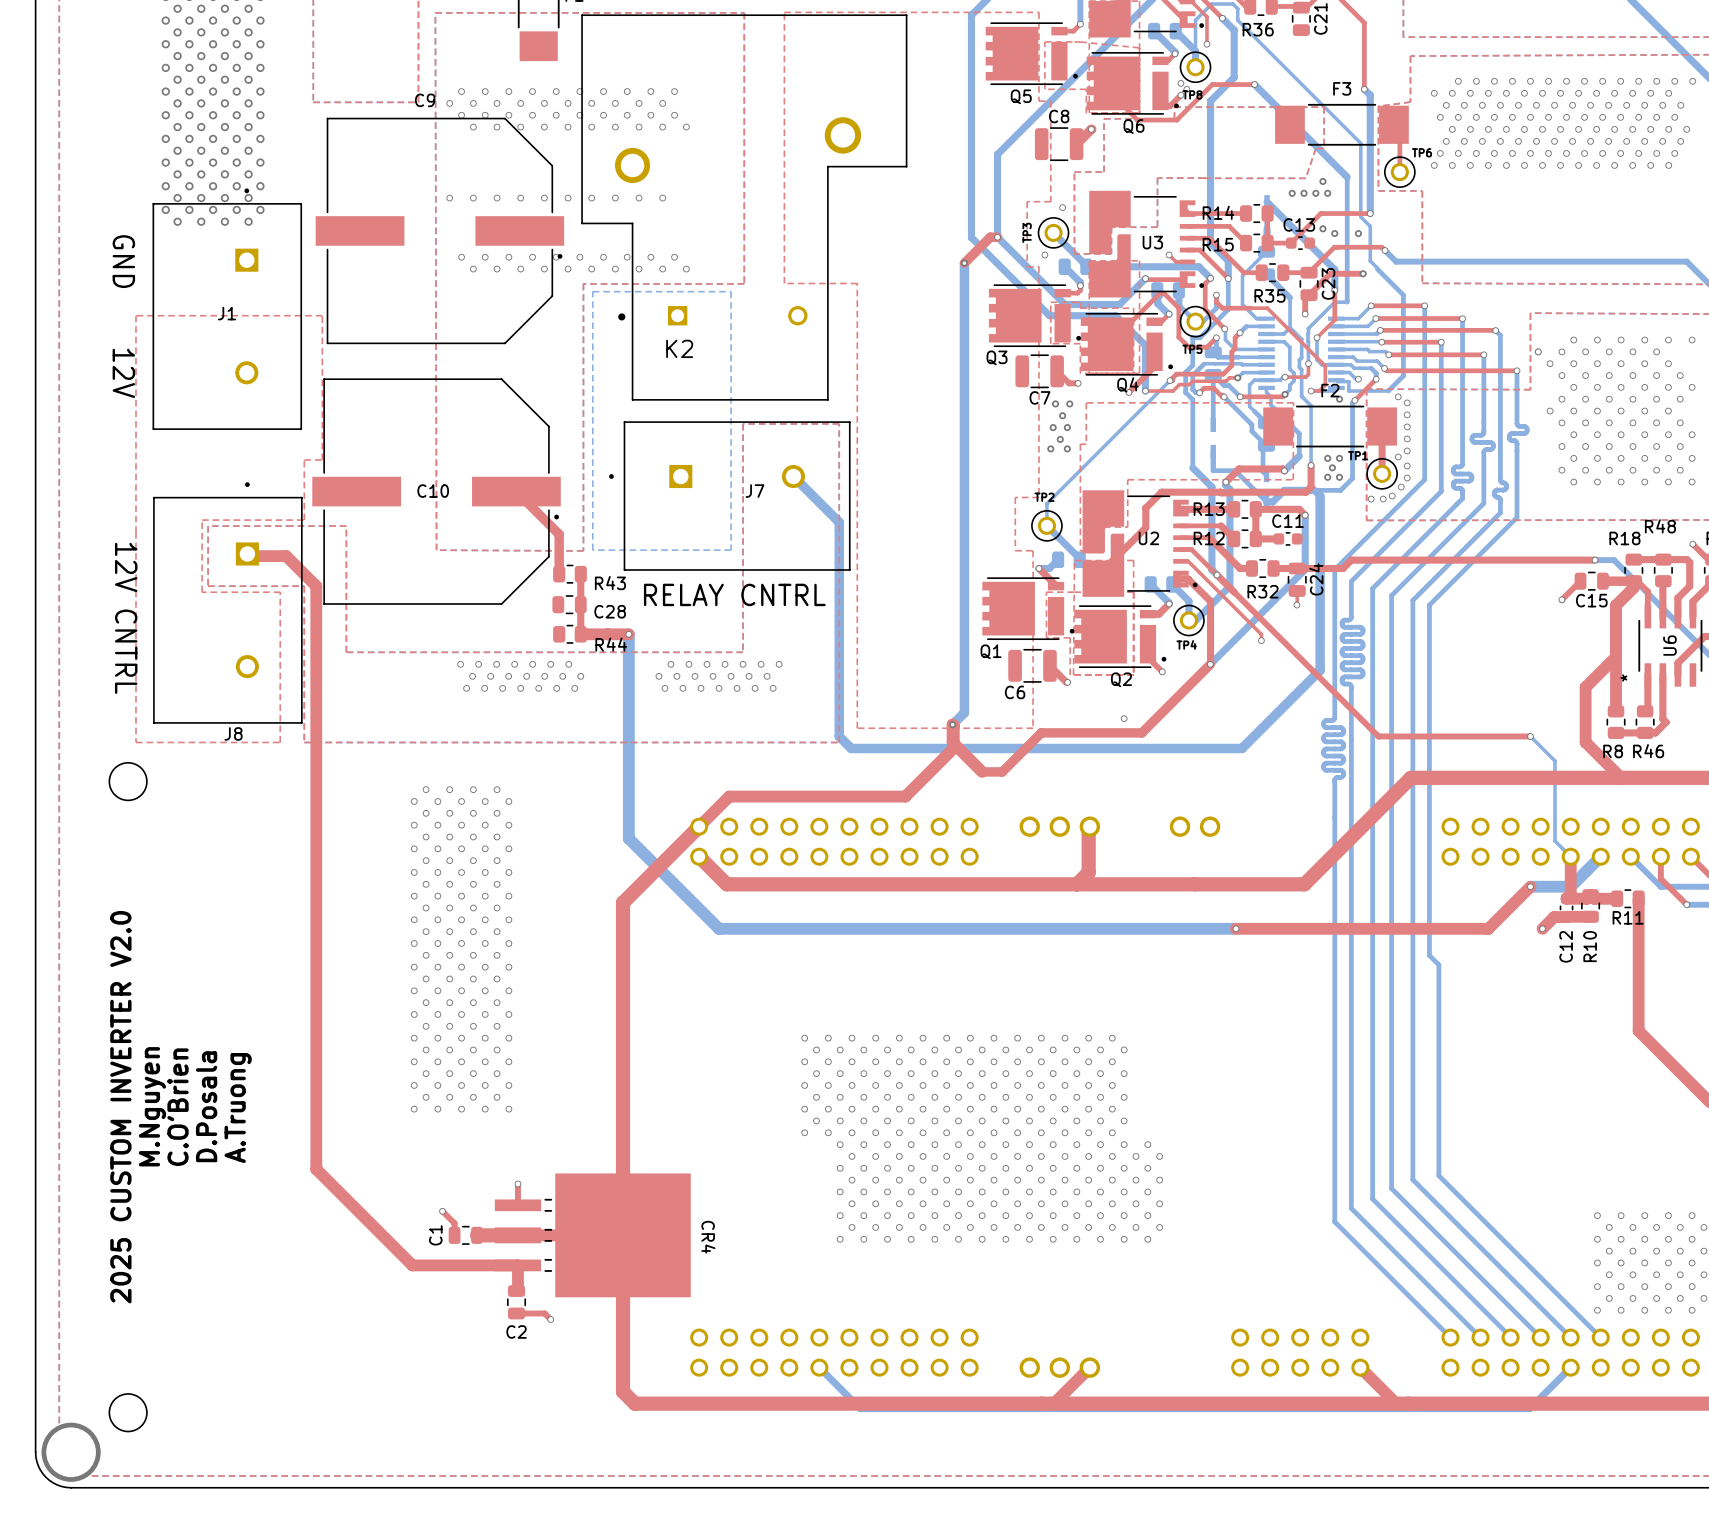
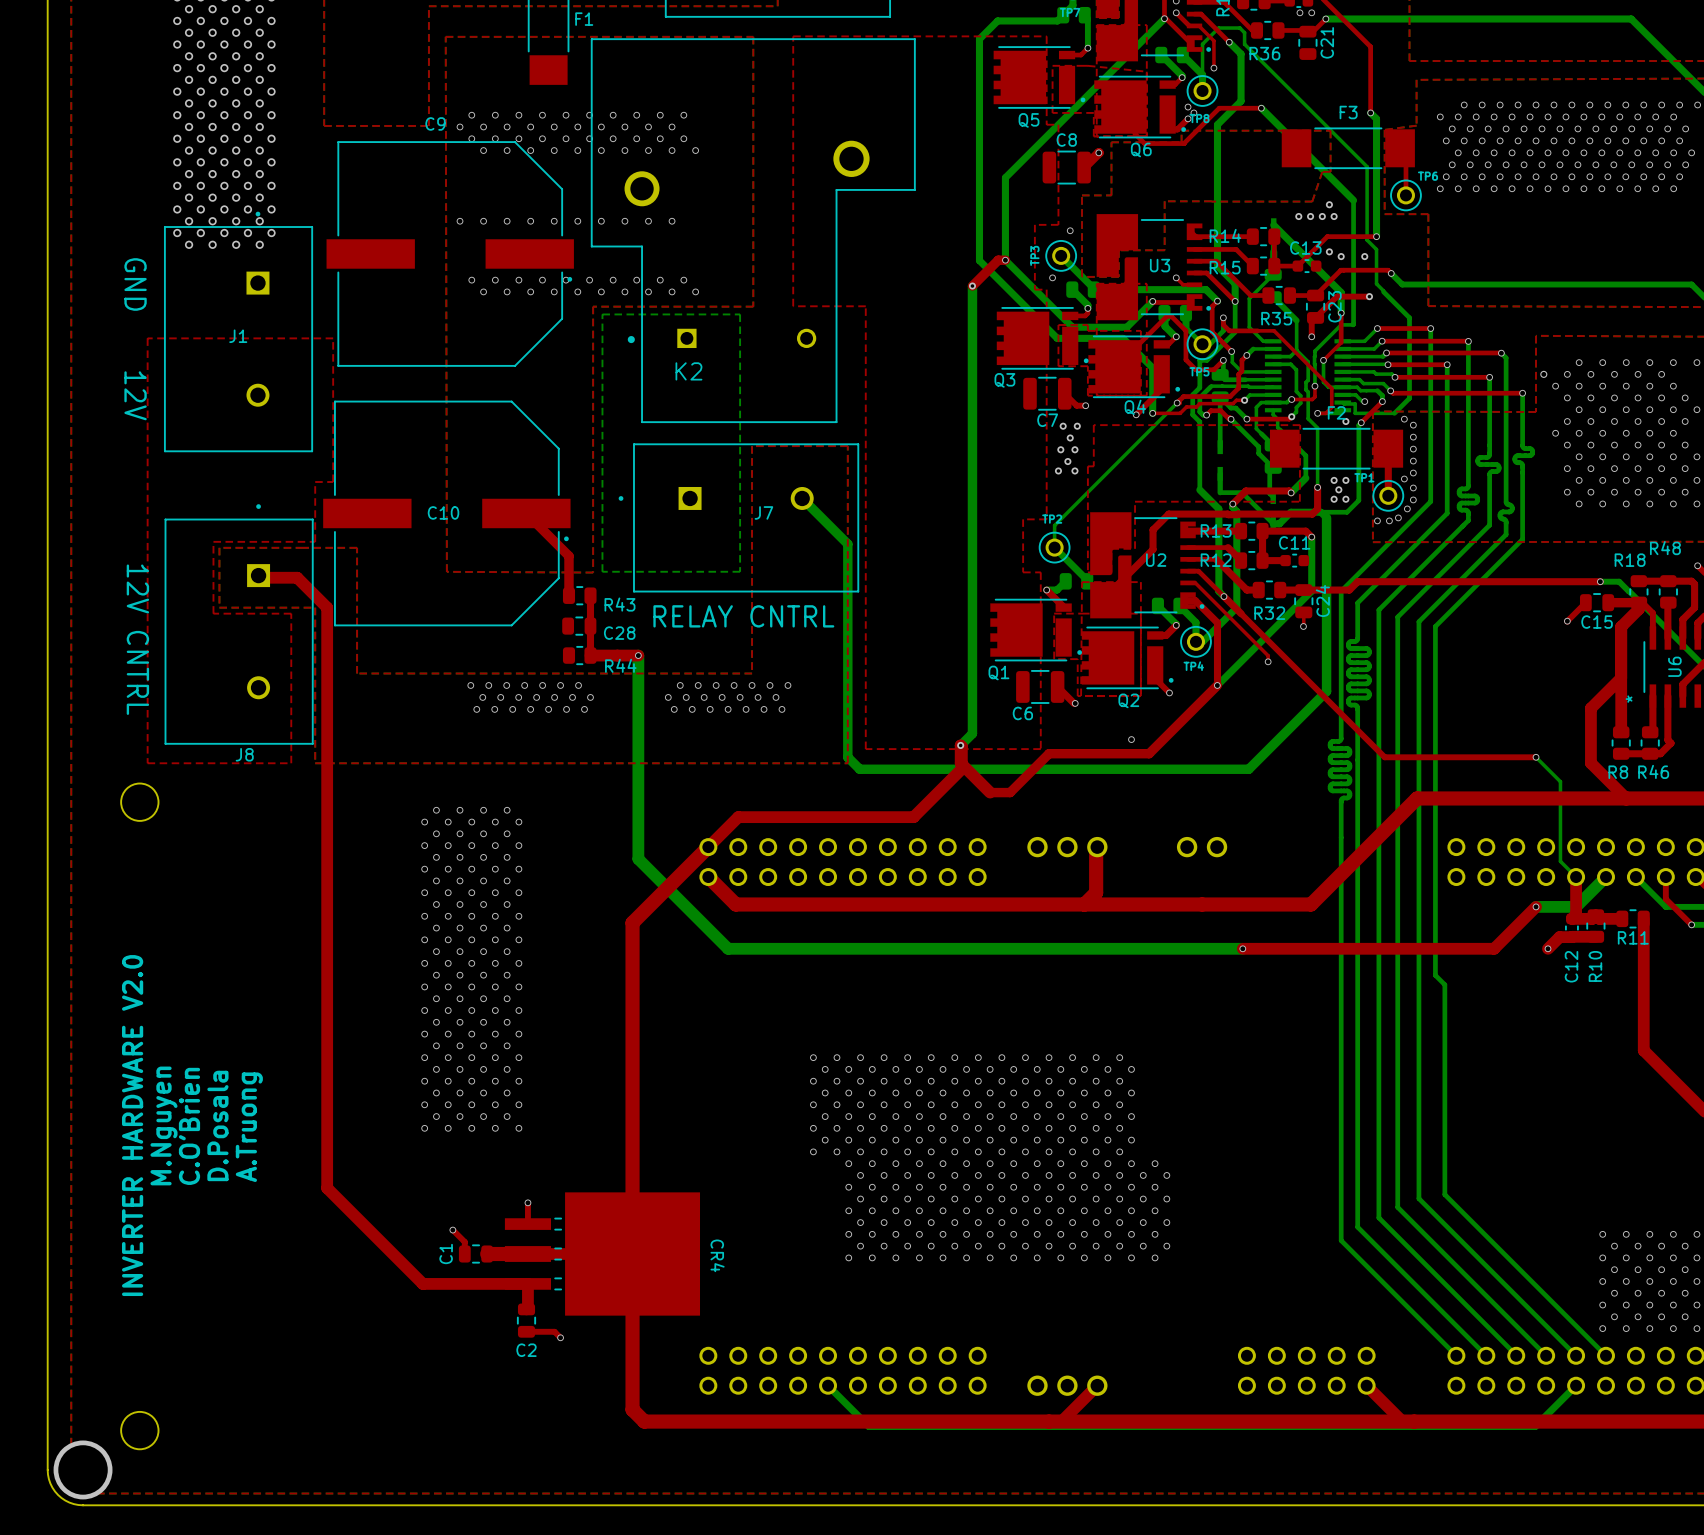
text: 2025 CUSTOM INVERTER V2.0 (120, 1107) -> INVERTER HARDWARE V2.0 (132, 1125)

